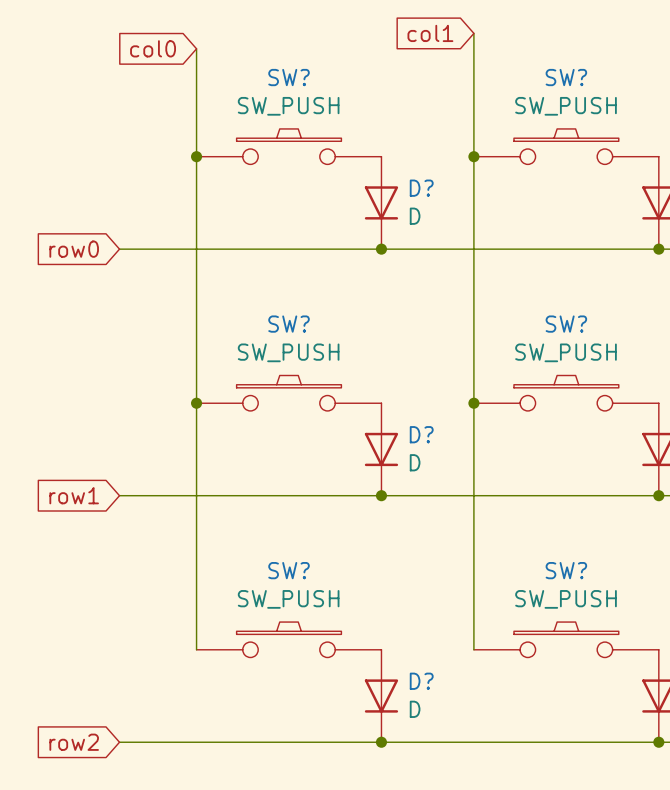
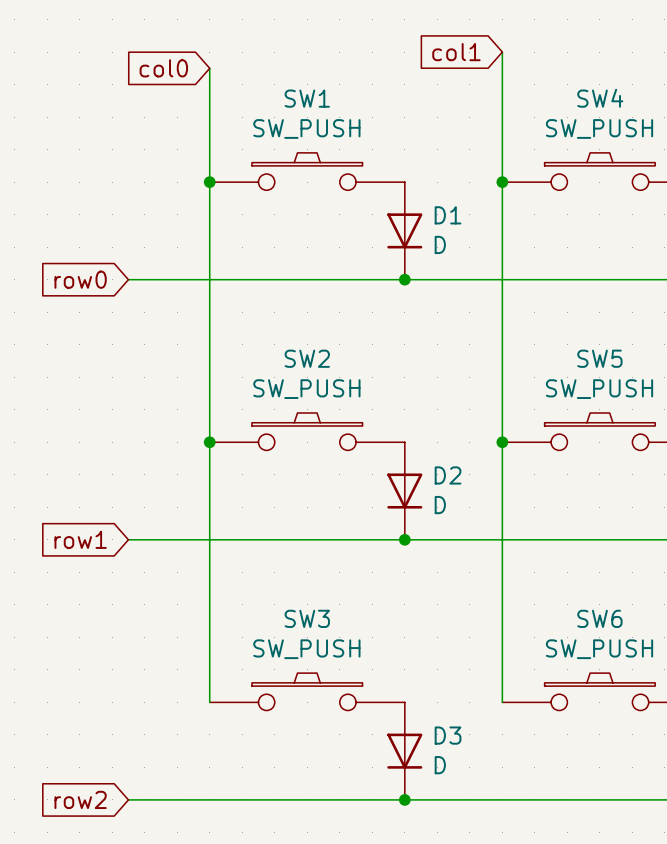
SW? name: SW? (289, 77) -> SW1 (307, 98)
SW? name: SW? (566, 77) -> SW4 (600, 98)
D? name: D? (421, 188) -> D1 (448, 215)
SW? name: SW? (289, 324) -> SW2 (307, 358)
SW? name: SW? (566, 324) -> SW5 (599, 358)
D? name: D? (421, 434) -> D2 (448, 475)
SW? name: SW? (289, 570) -> SW3 (307, 618)
SW? name: SW? (566, 570) -> SW6 (599, 618)
D? name: D? (421, 681) -> D3 (448, 735)

